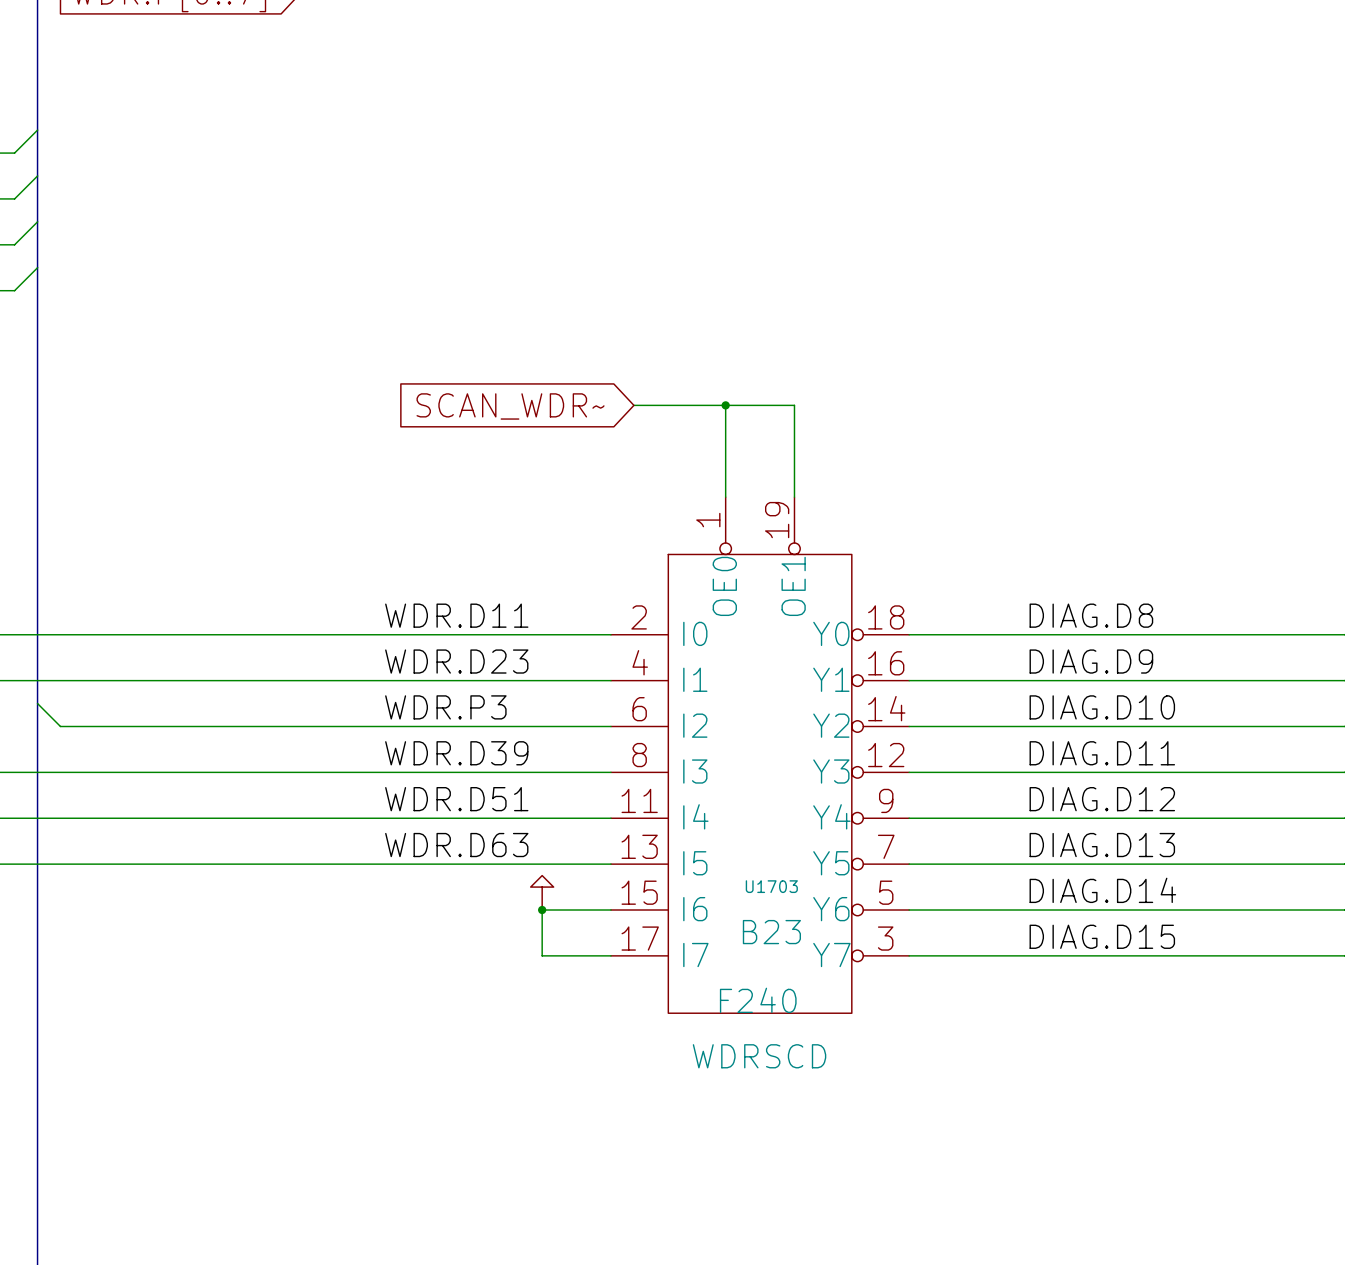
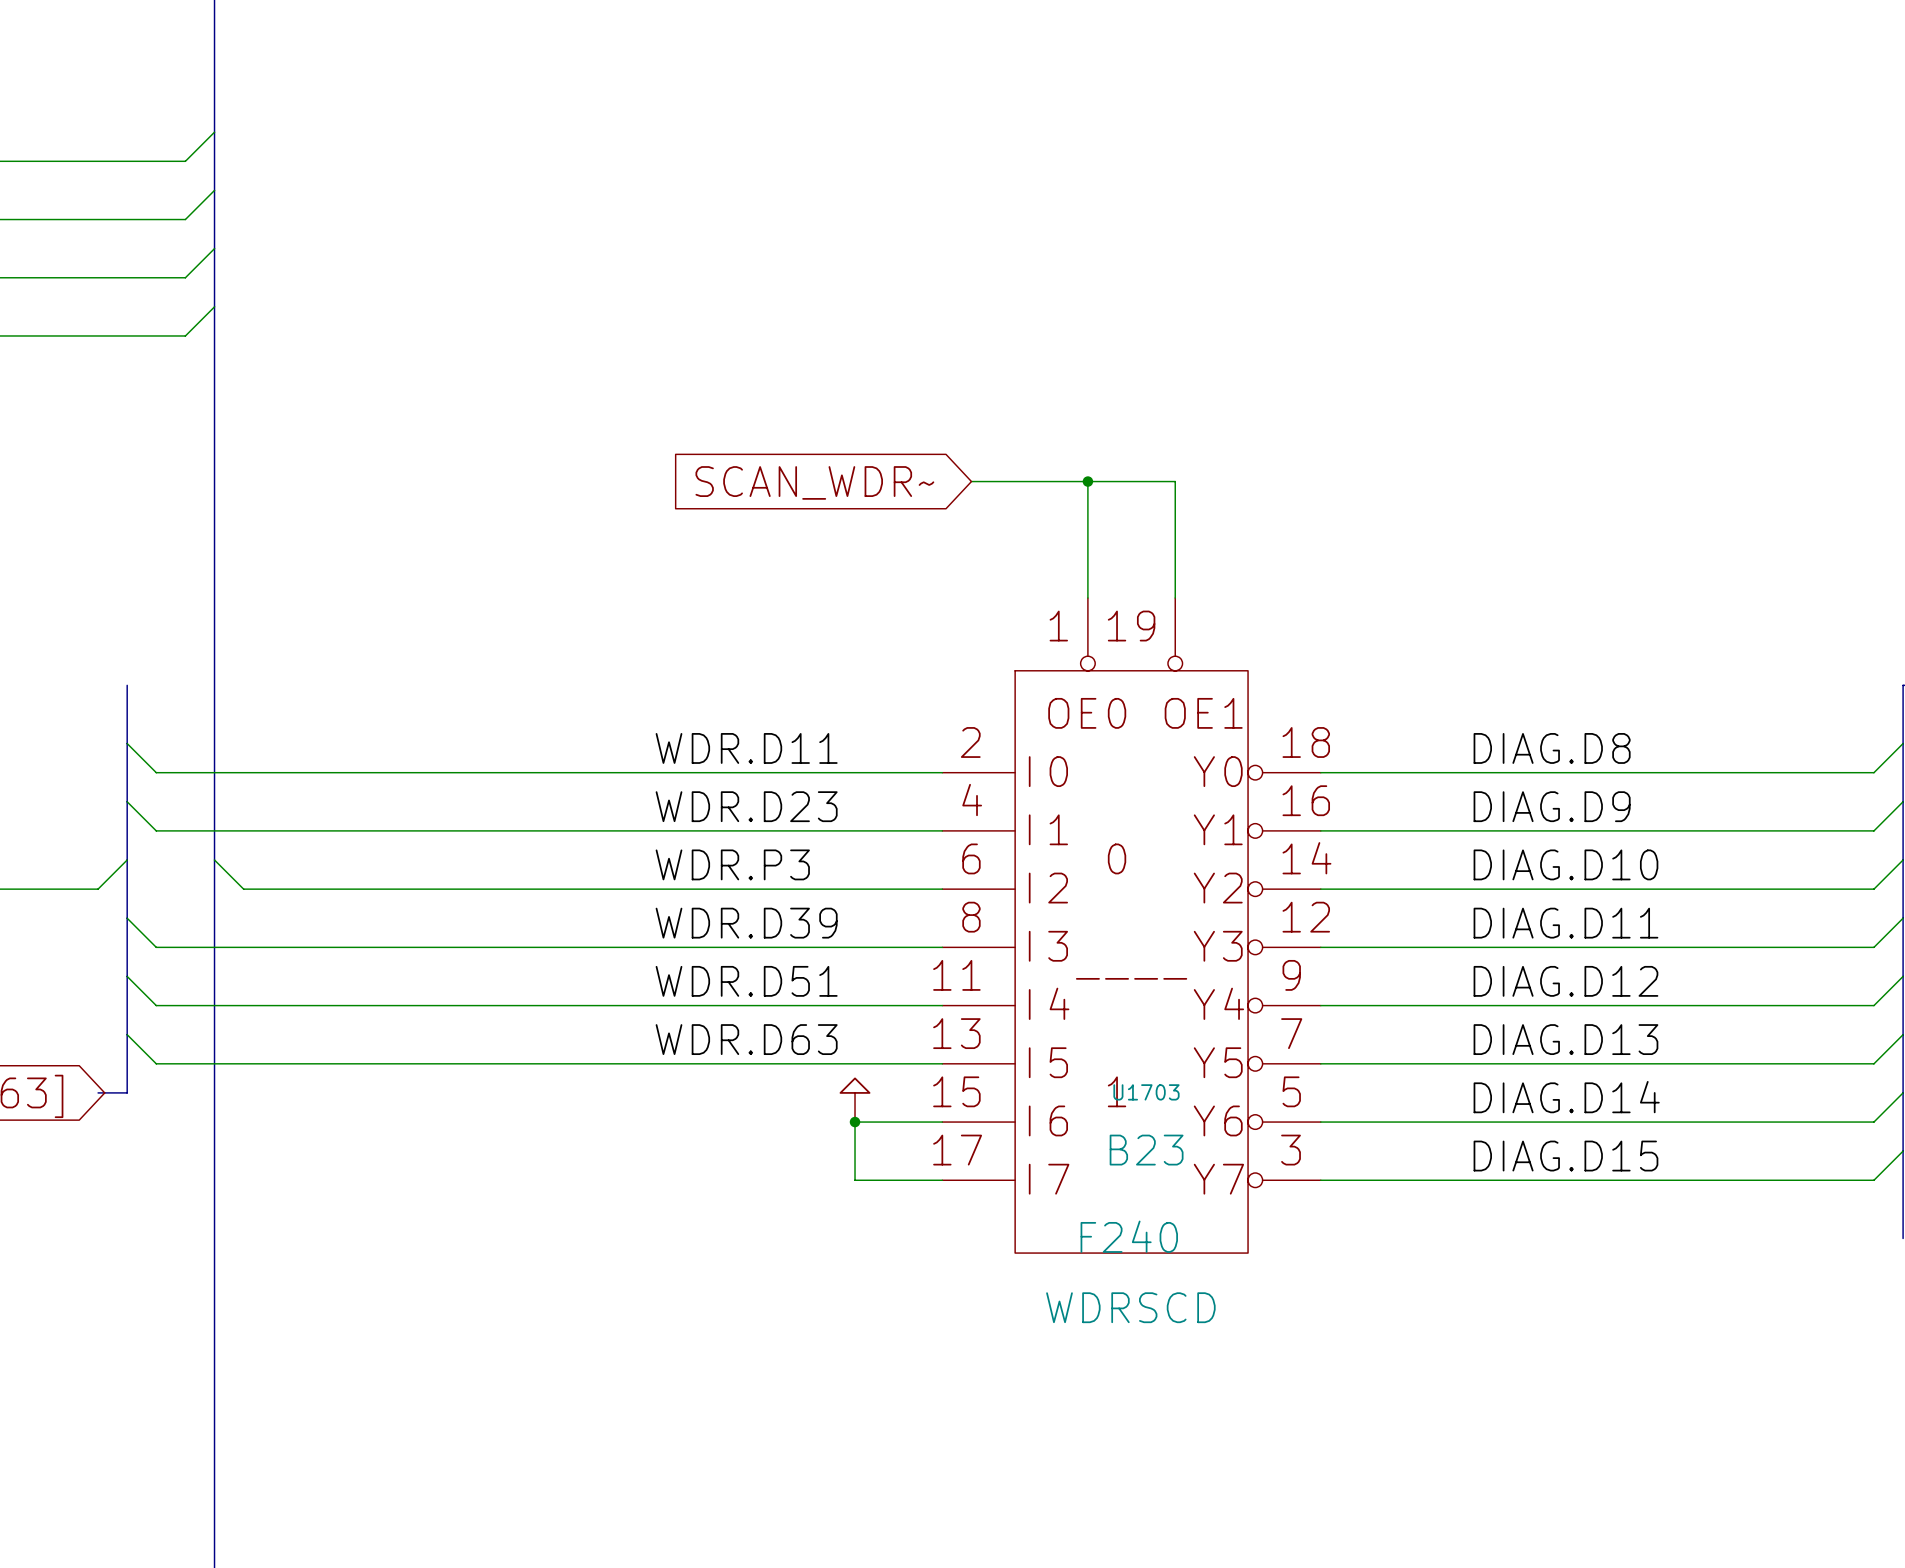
U1703 symbol: [610, 497, 910, 1014] -> [942, 598, 1321, 1254]

